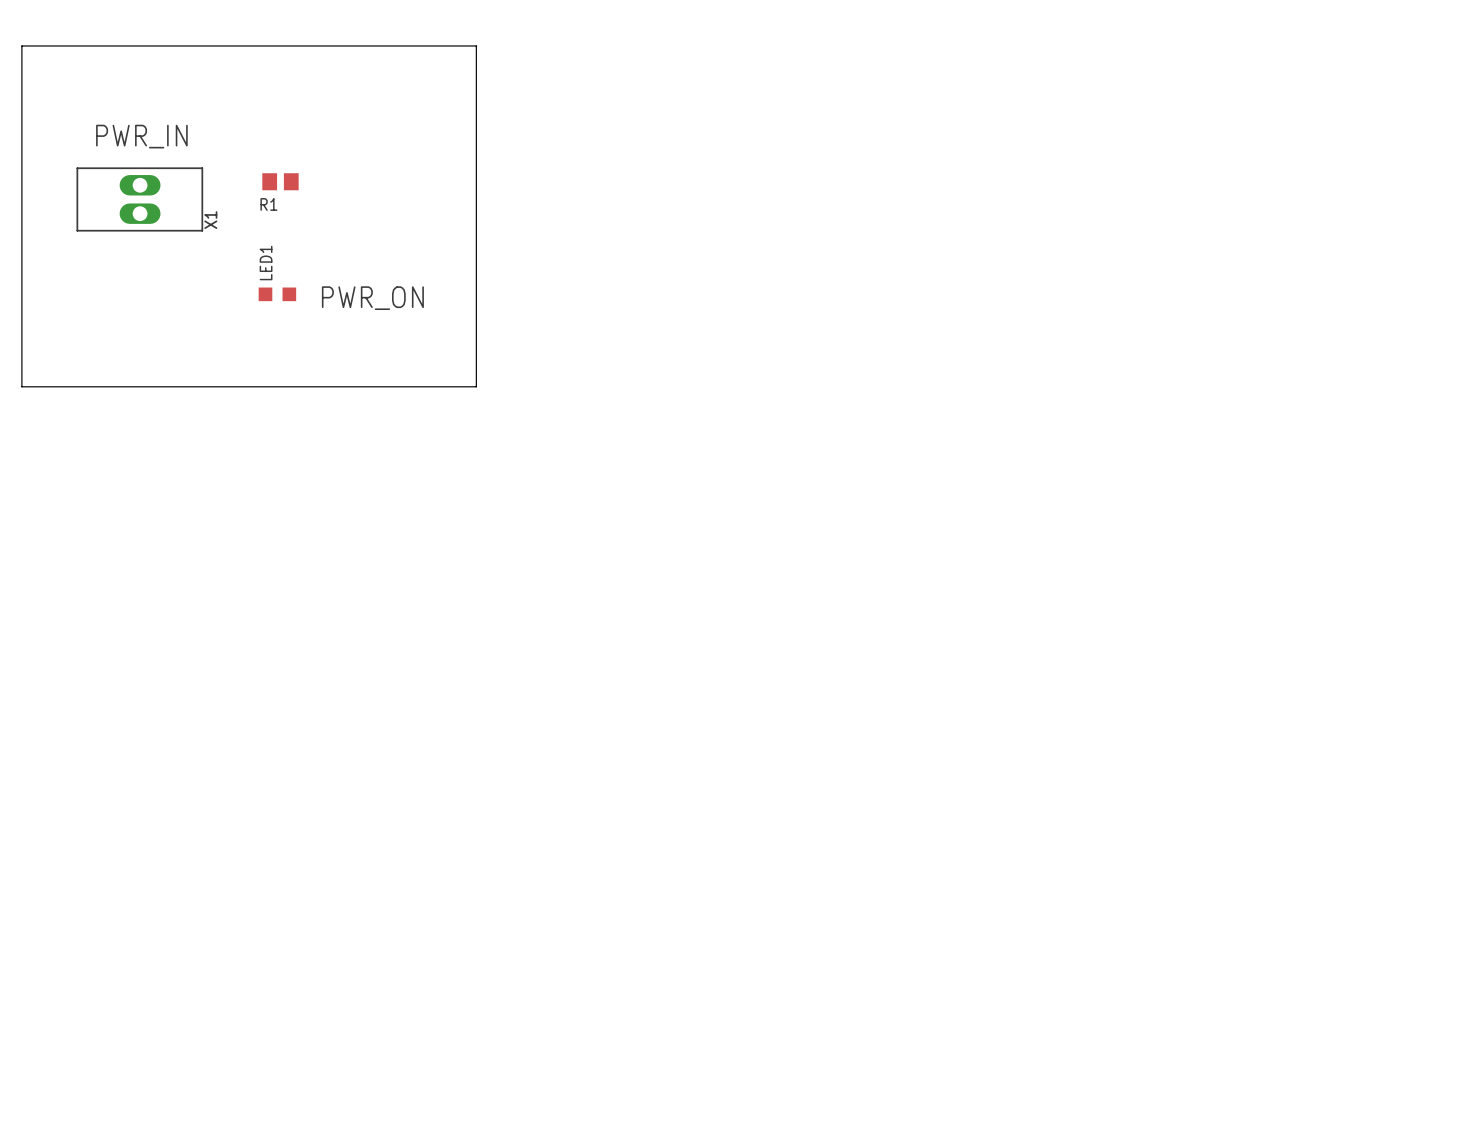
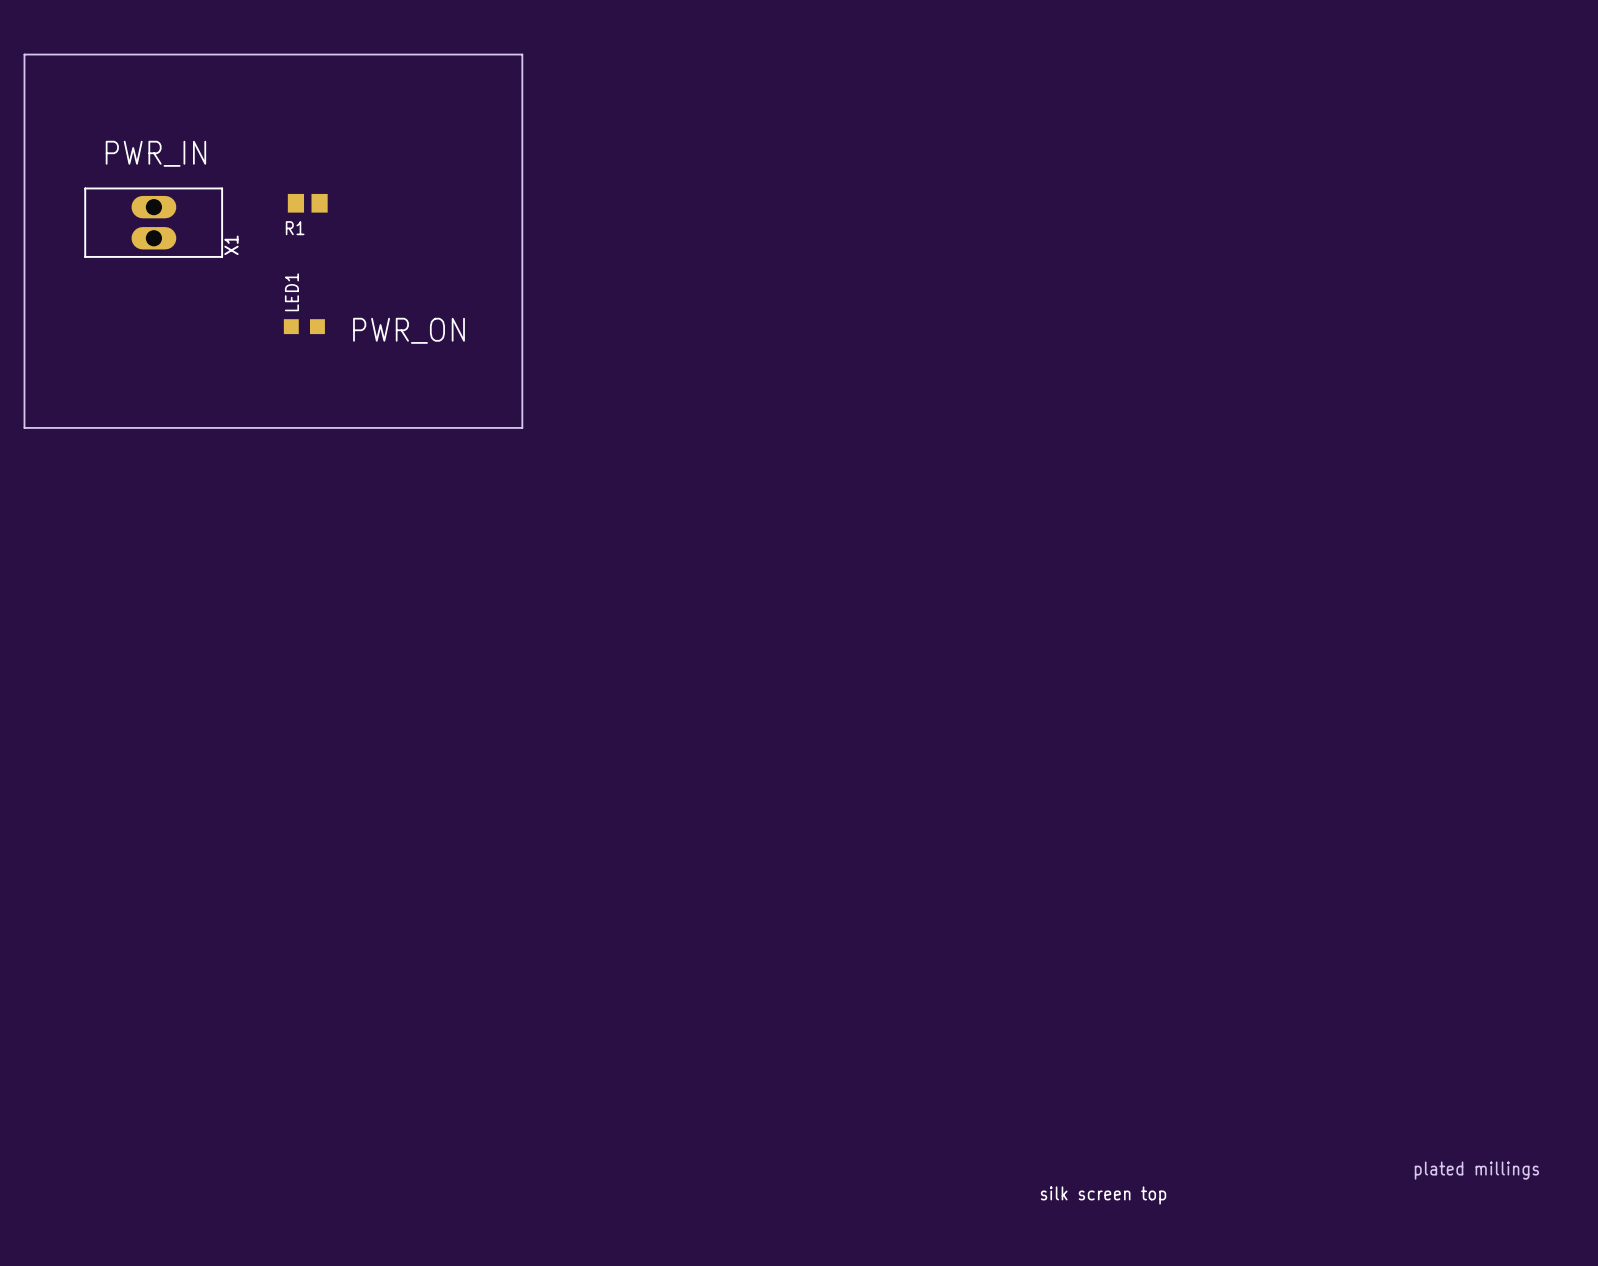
drawing: none -> [1041, 1161, 1539, 1205]

